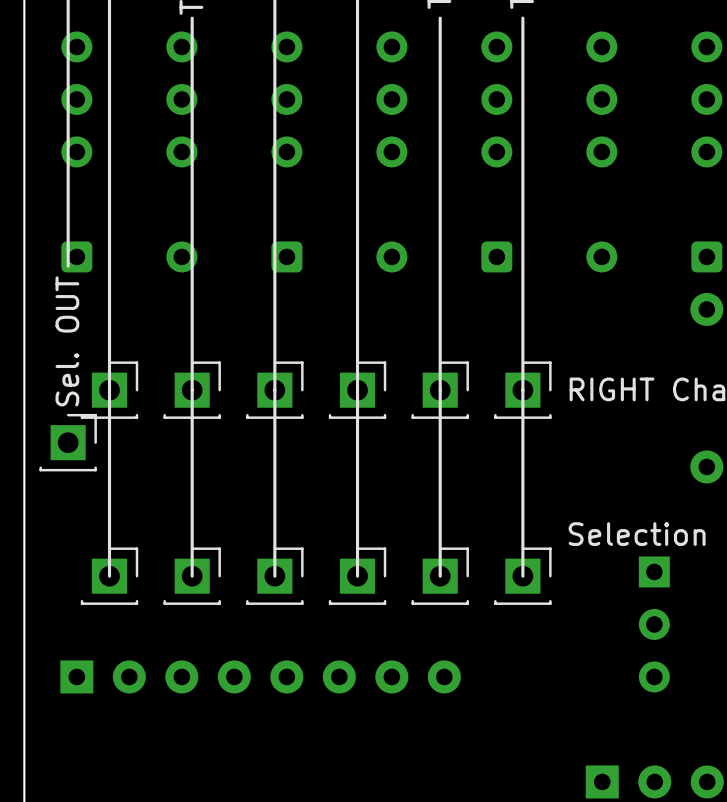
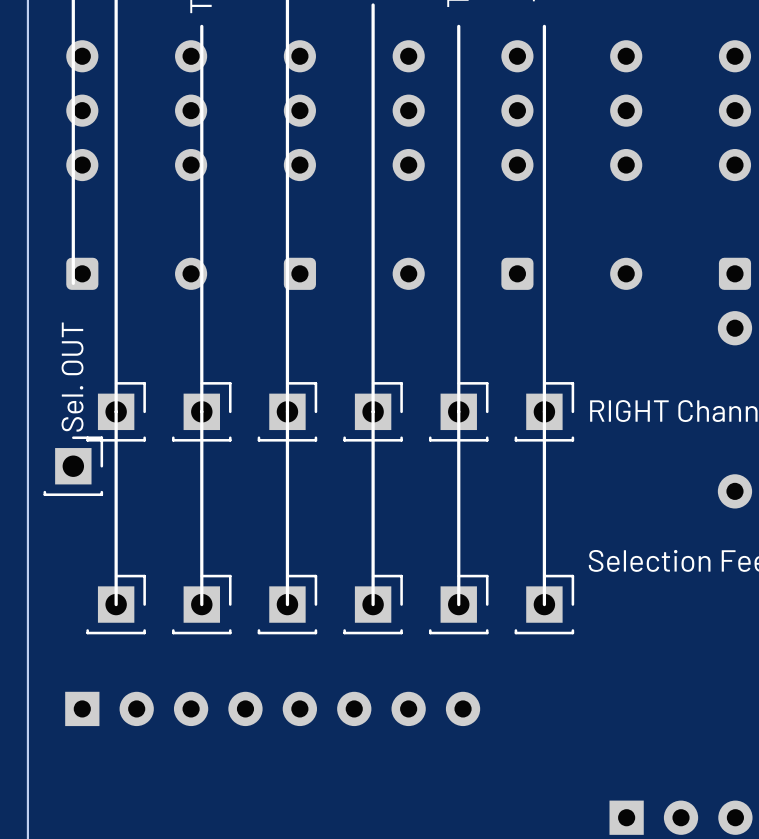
part: (654, 624) -> none

